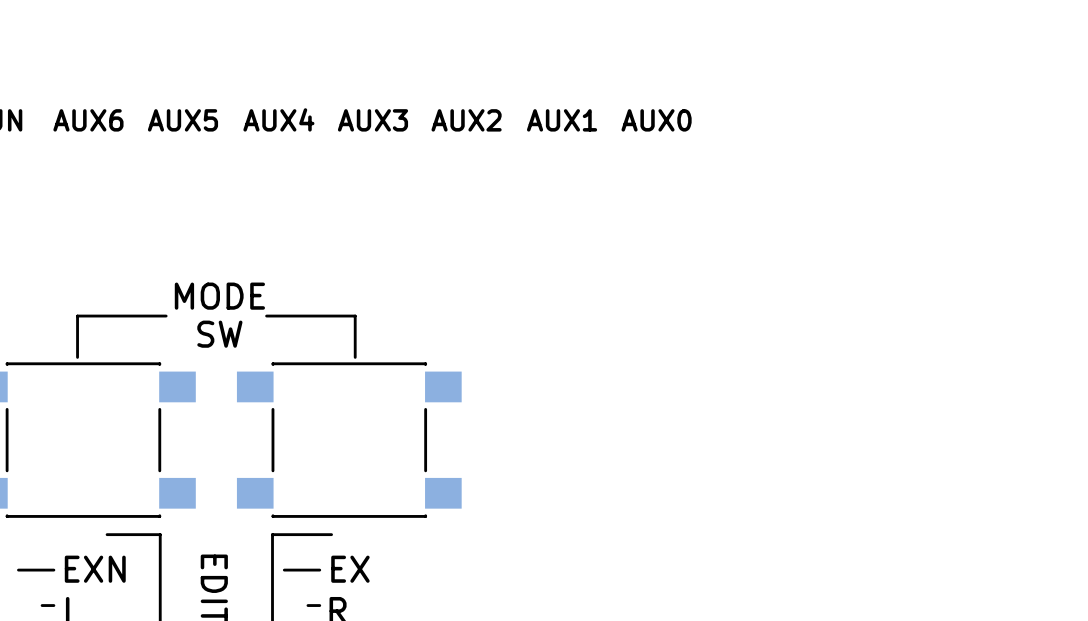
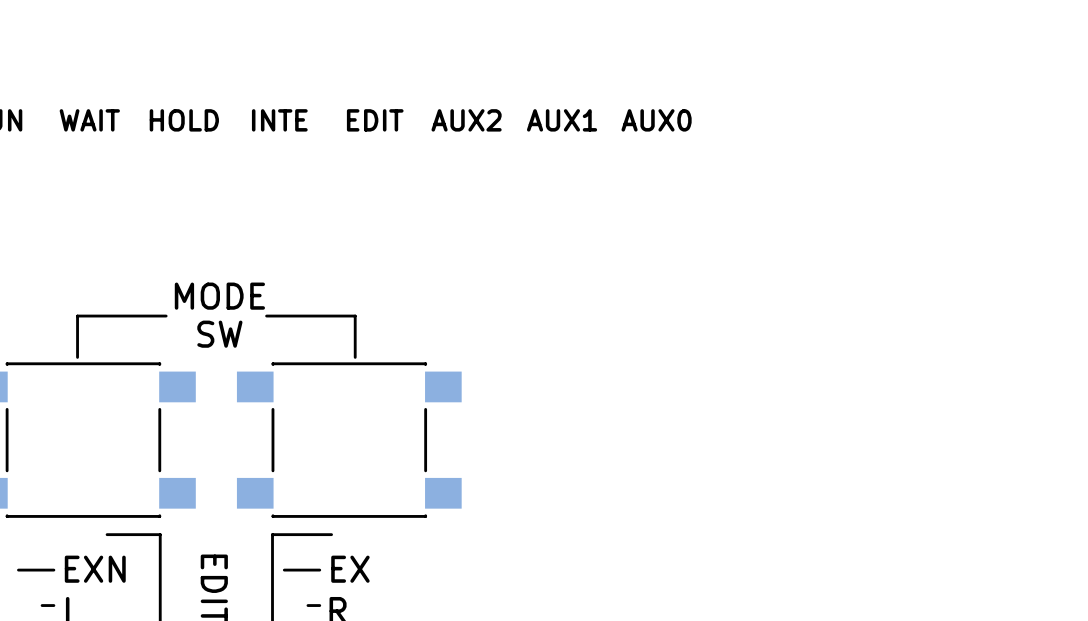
part text: AUX4 (278, 119) -> INTE (279, 120)
part text: AUX6 (88, 120) -> WAIT (89, 120)
part text: AUX5 (182, 120) -> HOLD (184, 120)
part text: AUX3 (372, 120) -> EDIT (375, 120)

